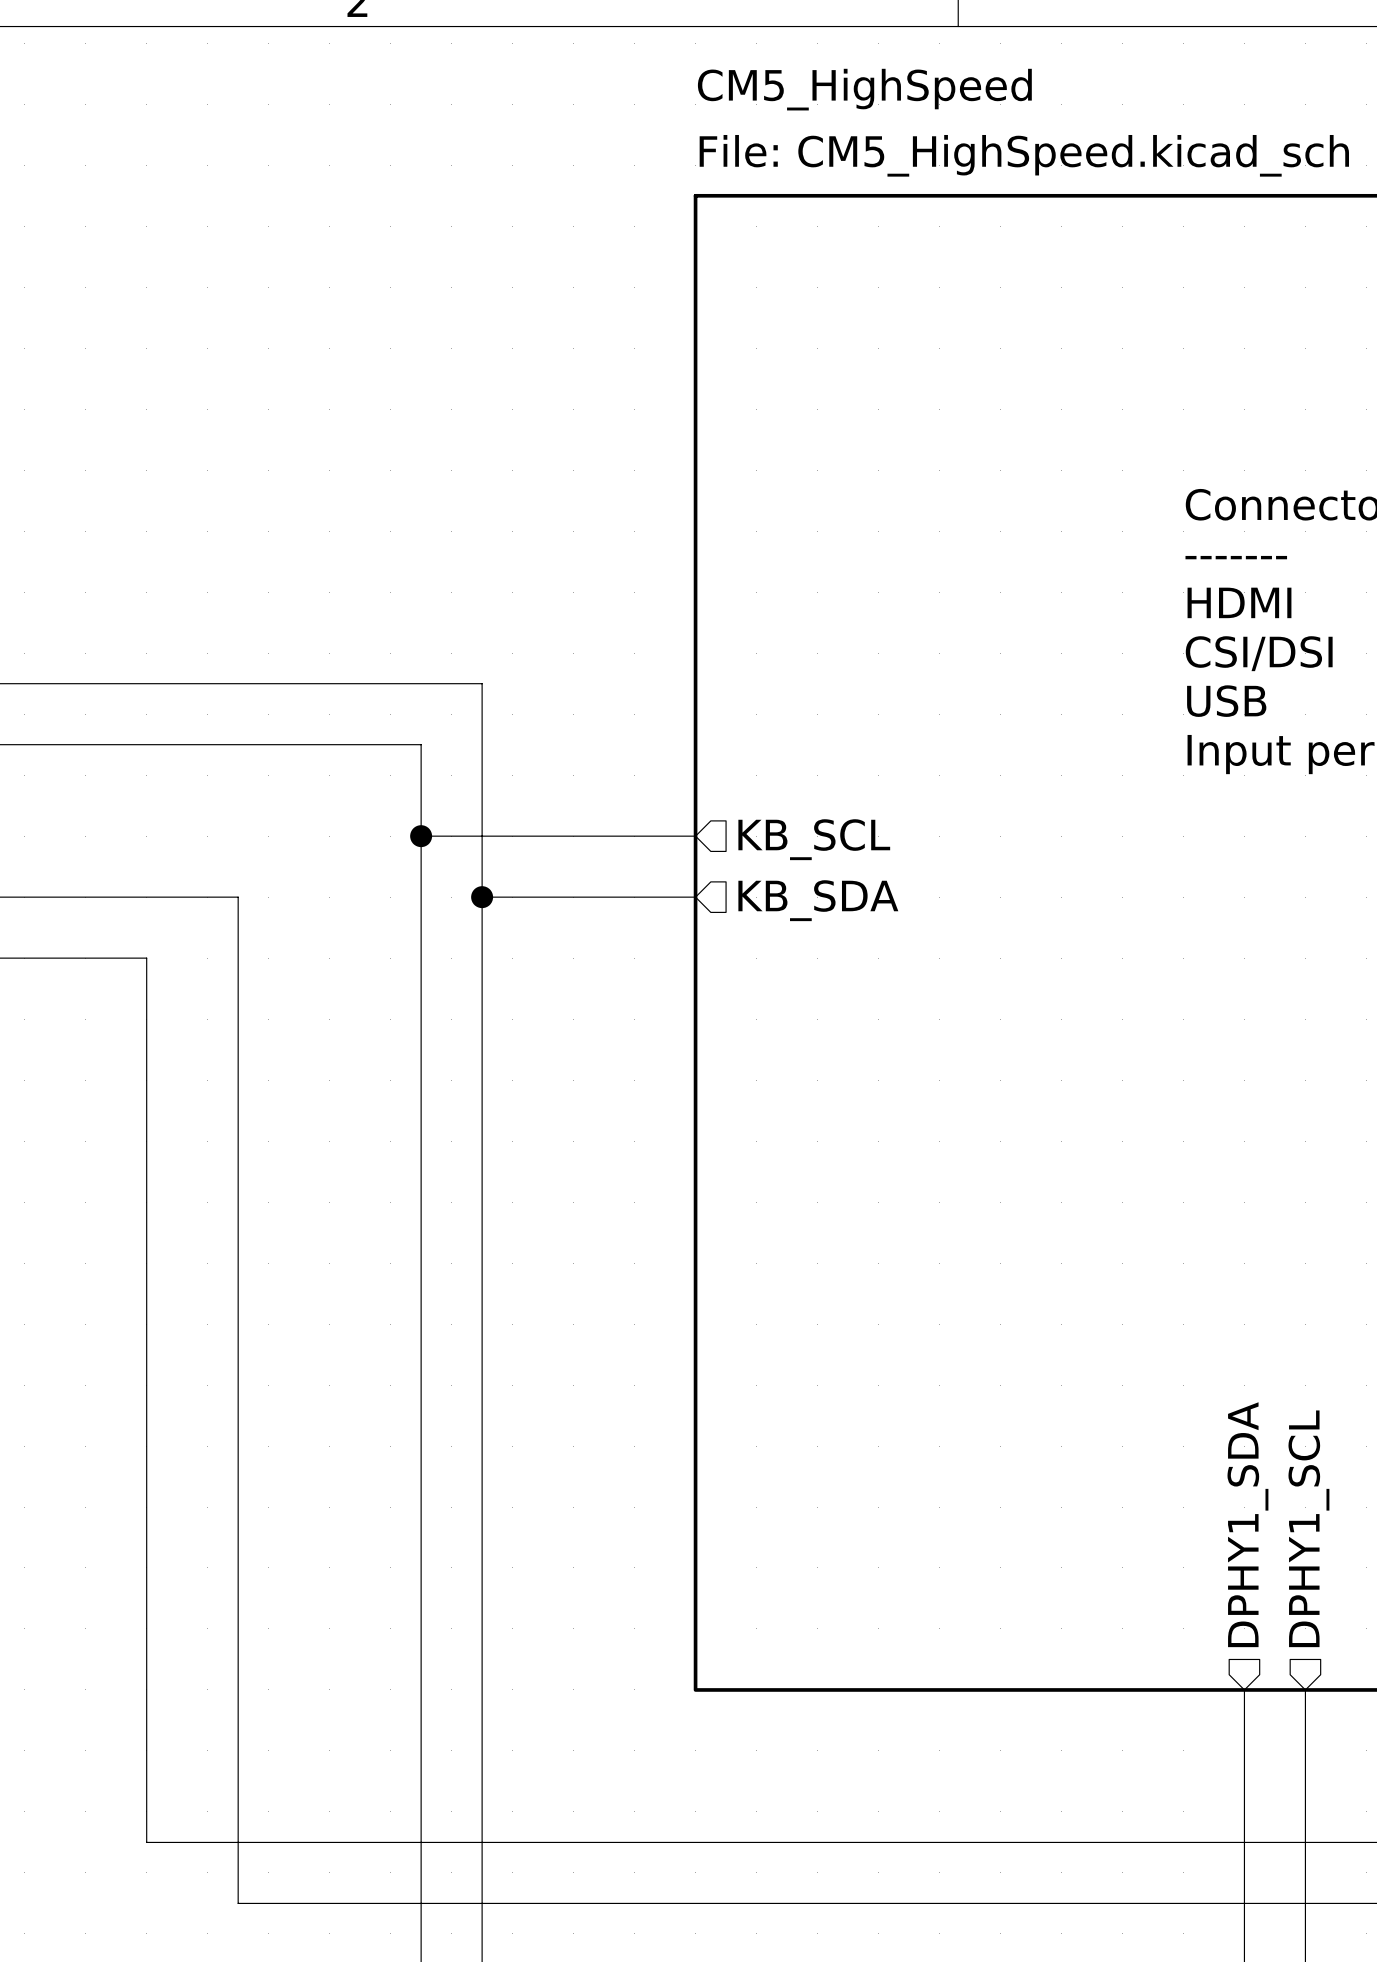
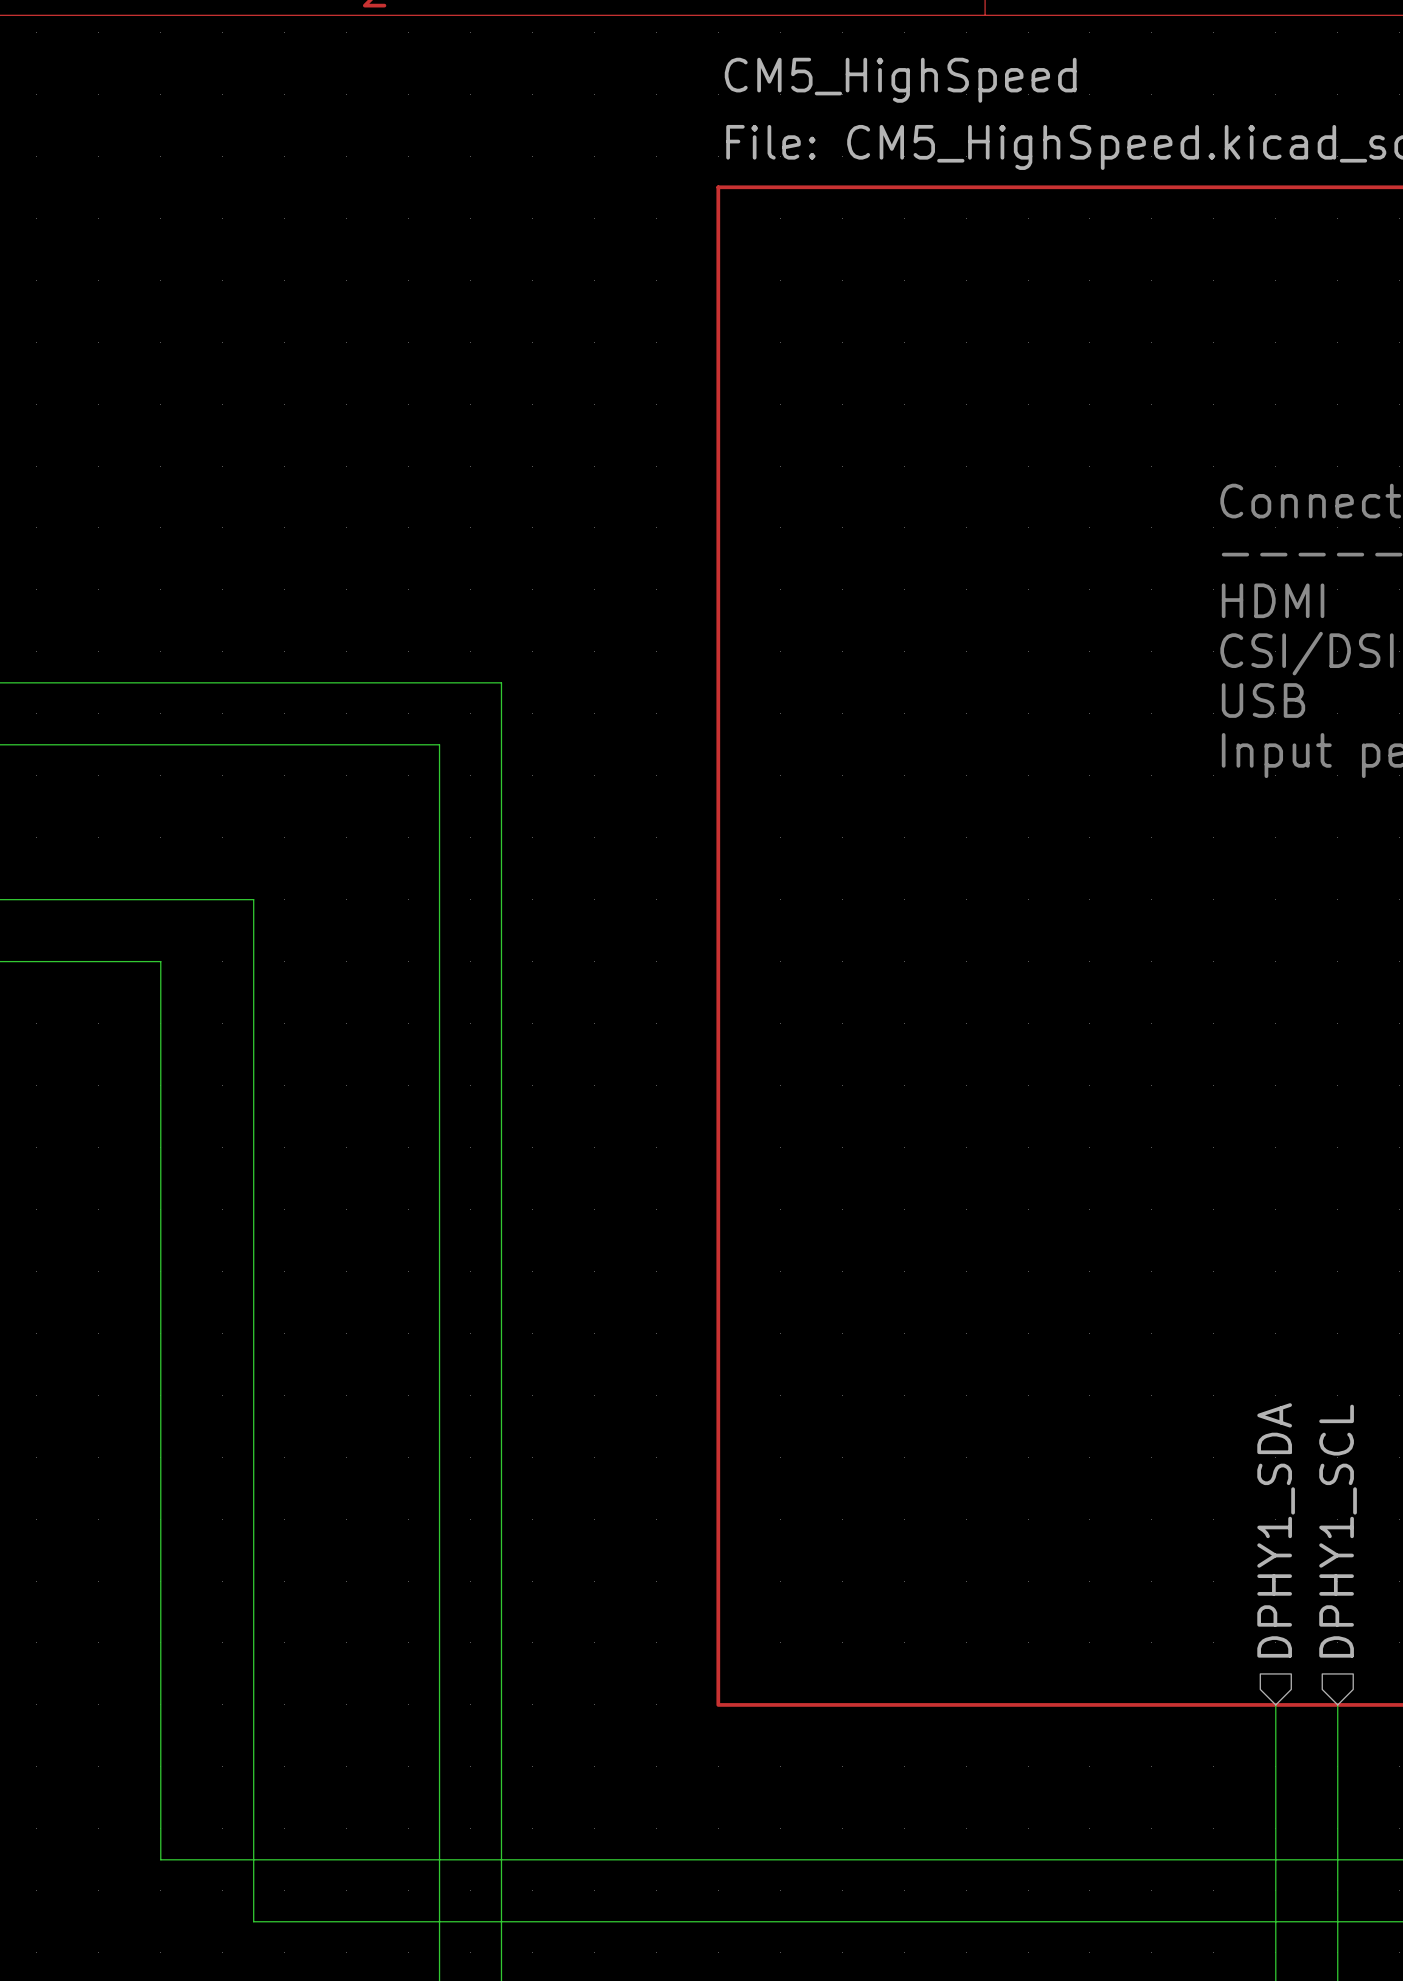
wire: (421, 836) (695, 836) -> none
junction: (421, 836) -> none
sheet pin: KB_SCL (814, 839) -> none
wire: (482, 897) (695, 897) -> none
junction: (482, 897) -> none
sheet pin: KB_SDA (818, 900) -> none

